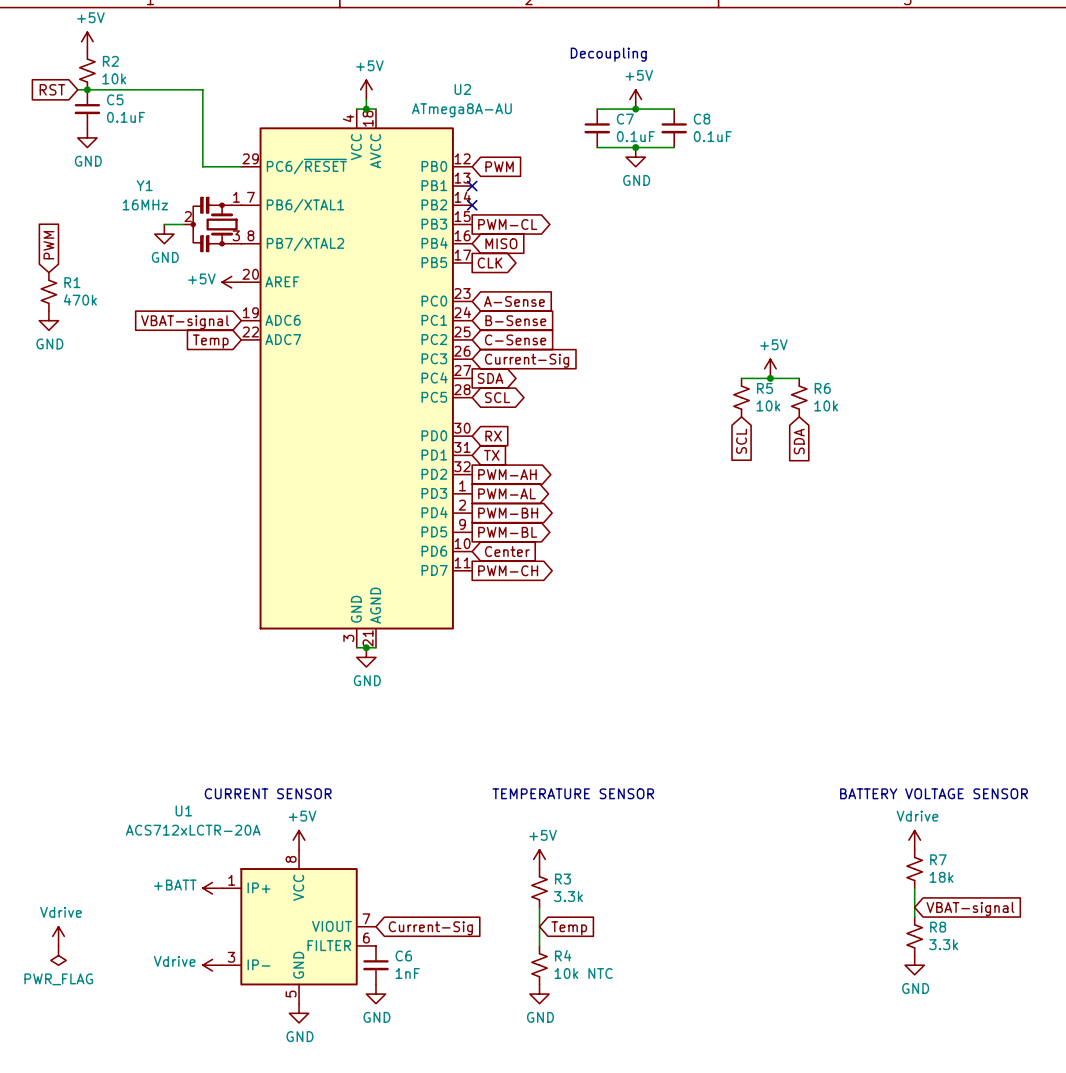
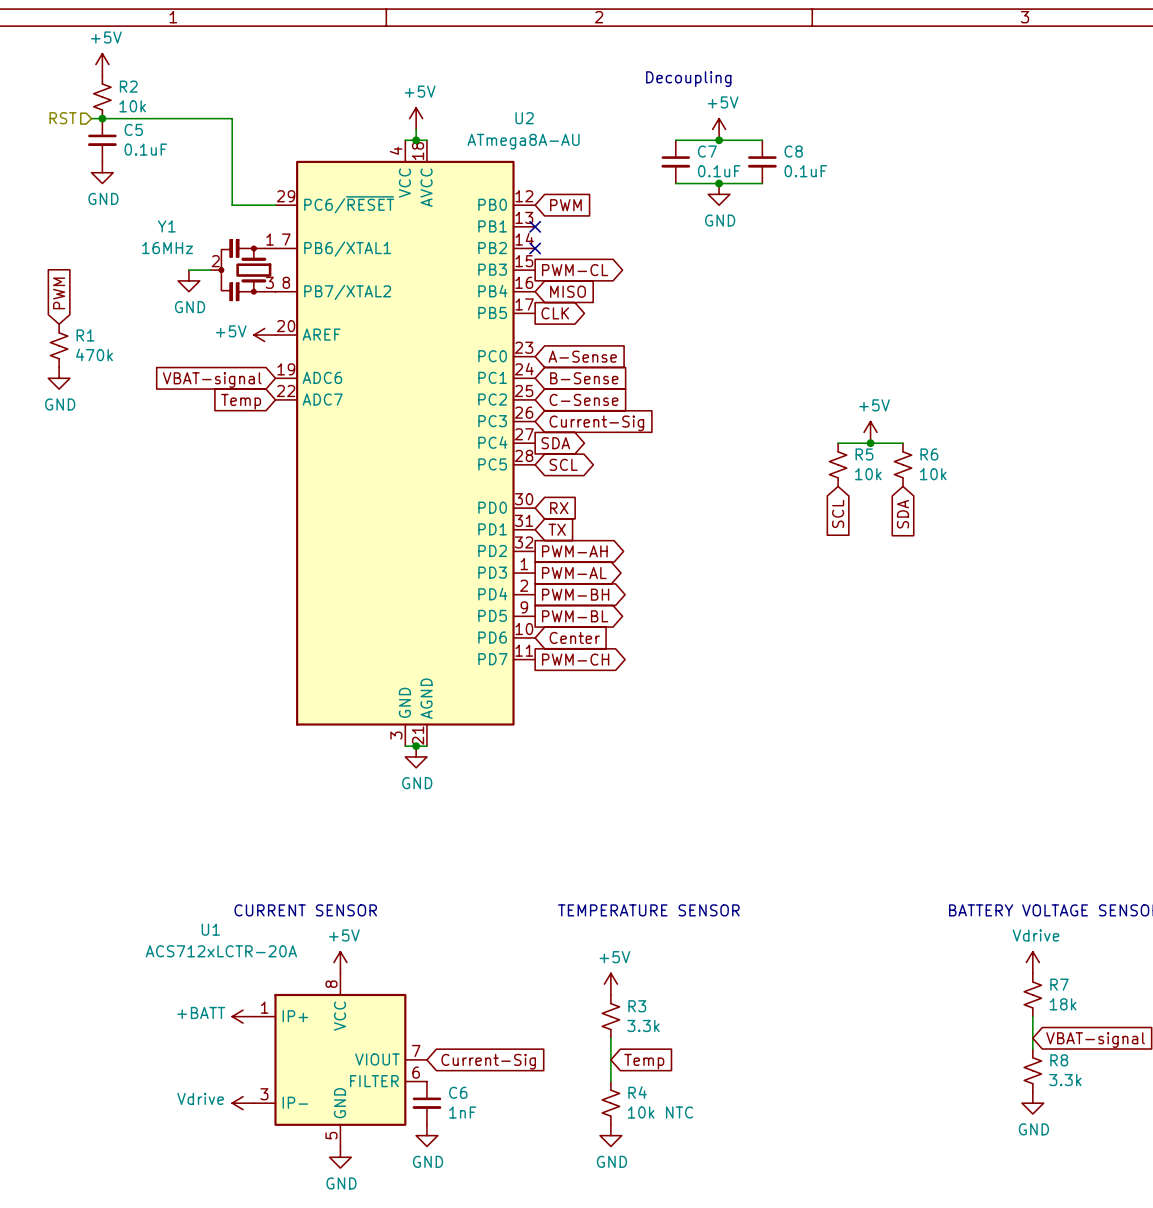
global label: RST (52, 89) -> none
hierarchical label: none -> RST (63, 118)
power symbol: Vdrive (58, 936) -> none
power symbol: PWR_FLAG (58, 955) -> none

